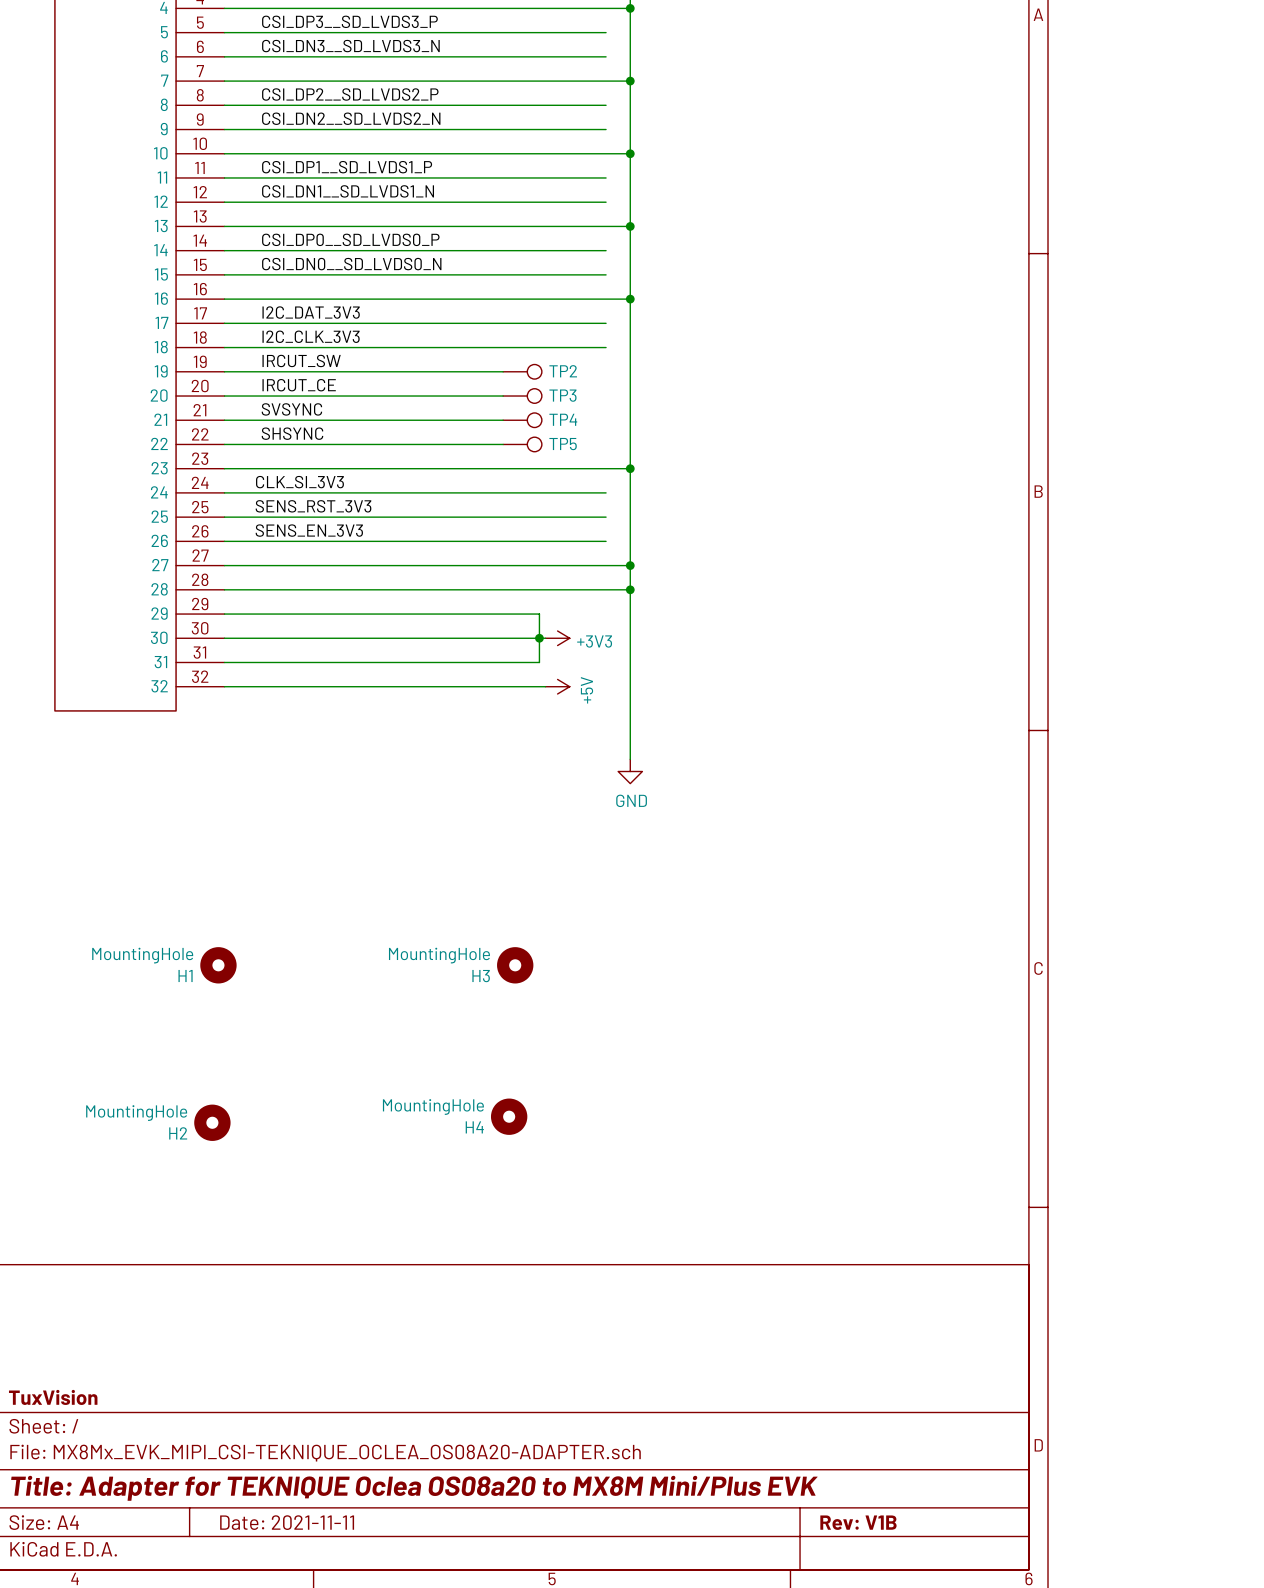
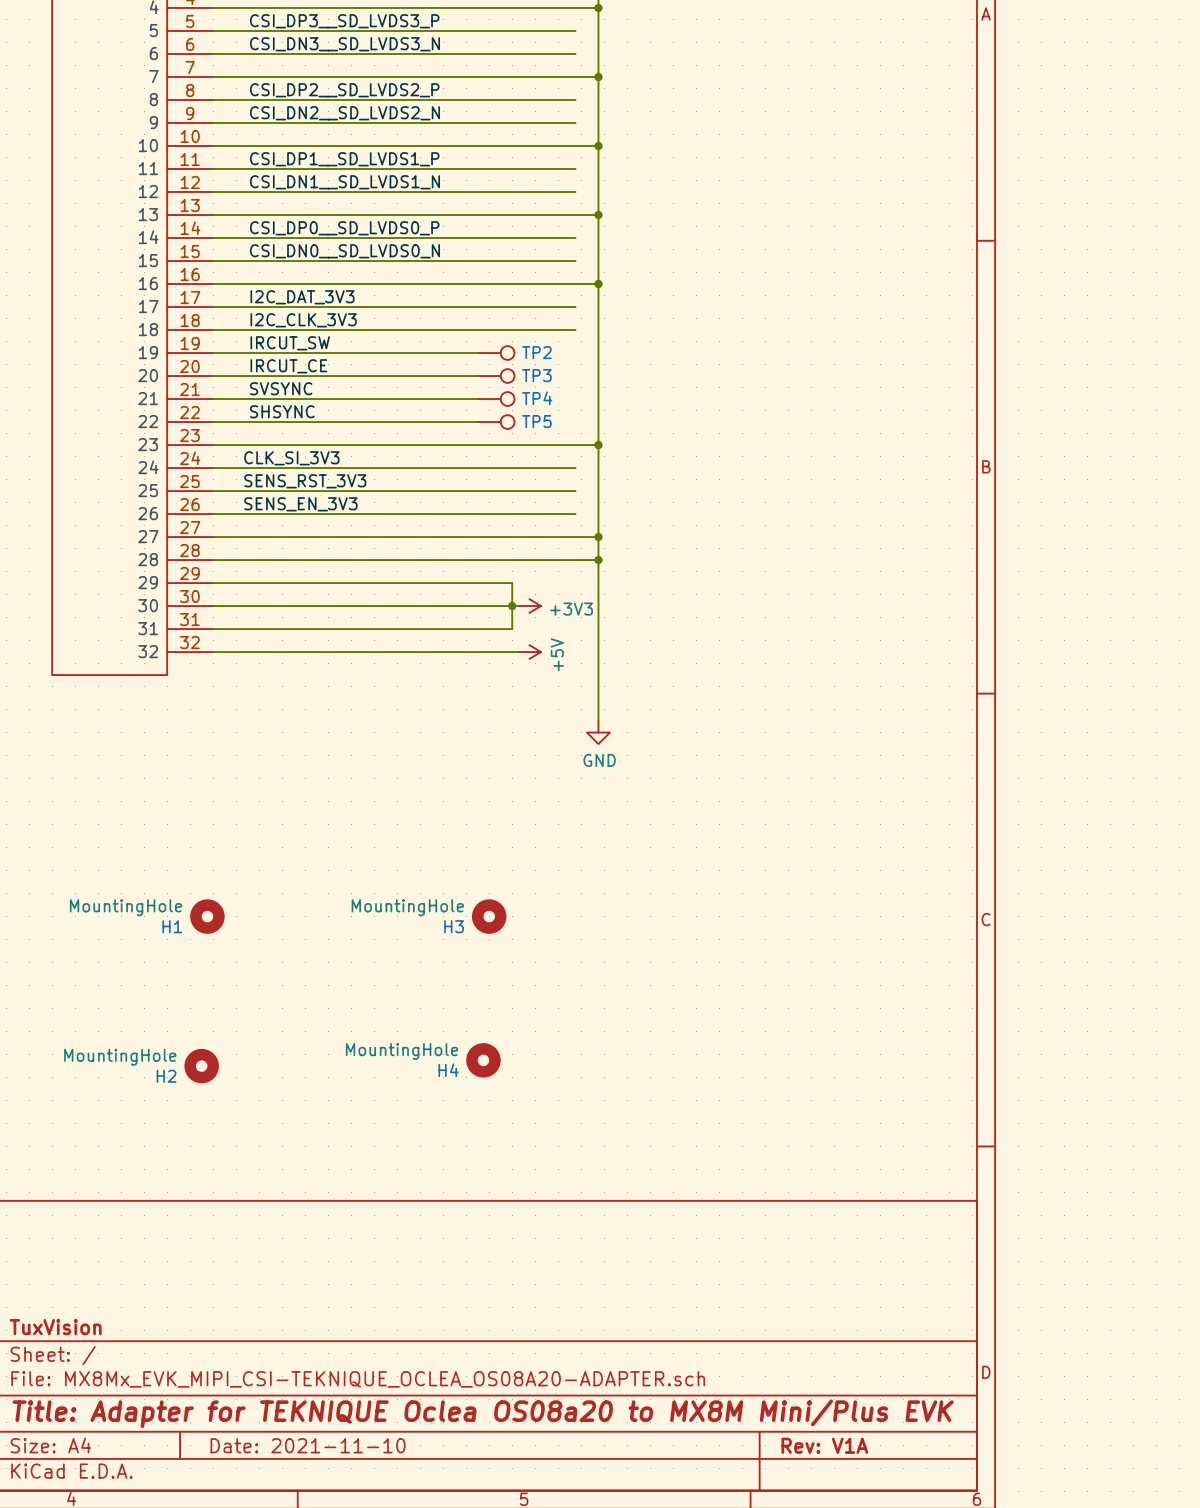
title block: Date: 2021-11-11 (287, 1522) -> Date: 2021-11-10 (308, 1445)
title block: Rev: V1B (858, 1522) -> Rev: V1A (824, 1445)

